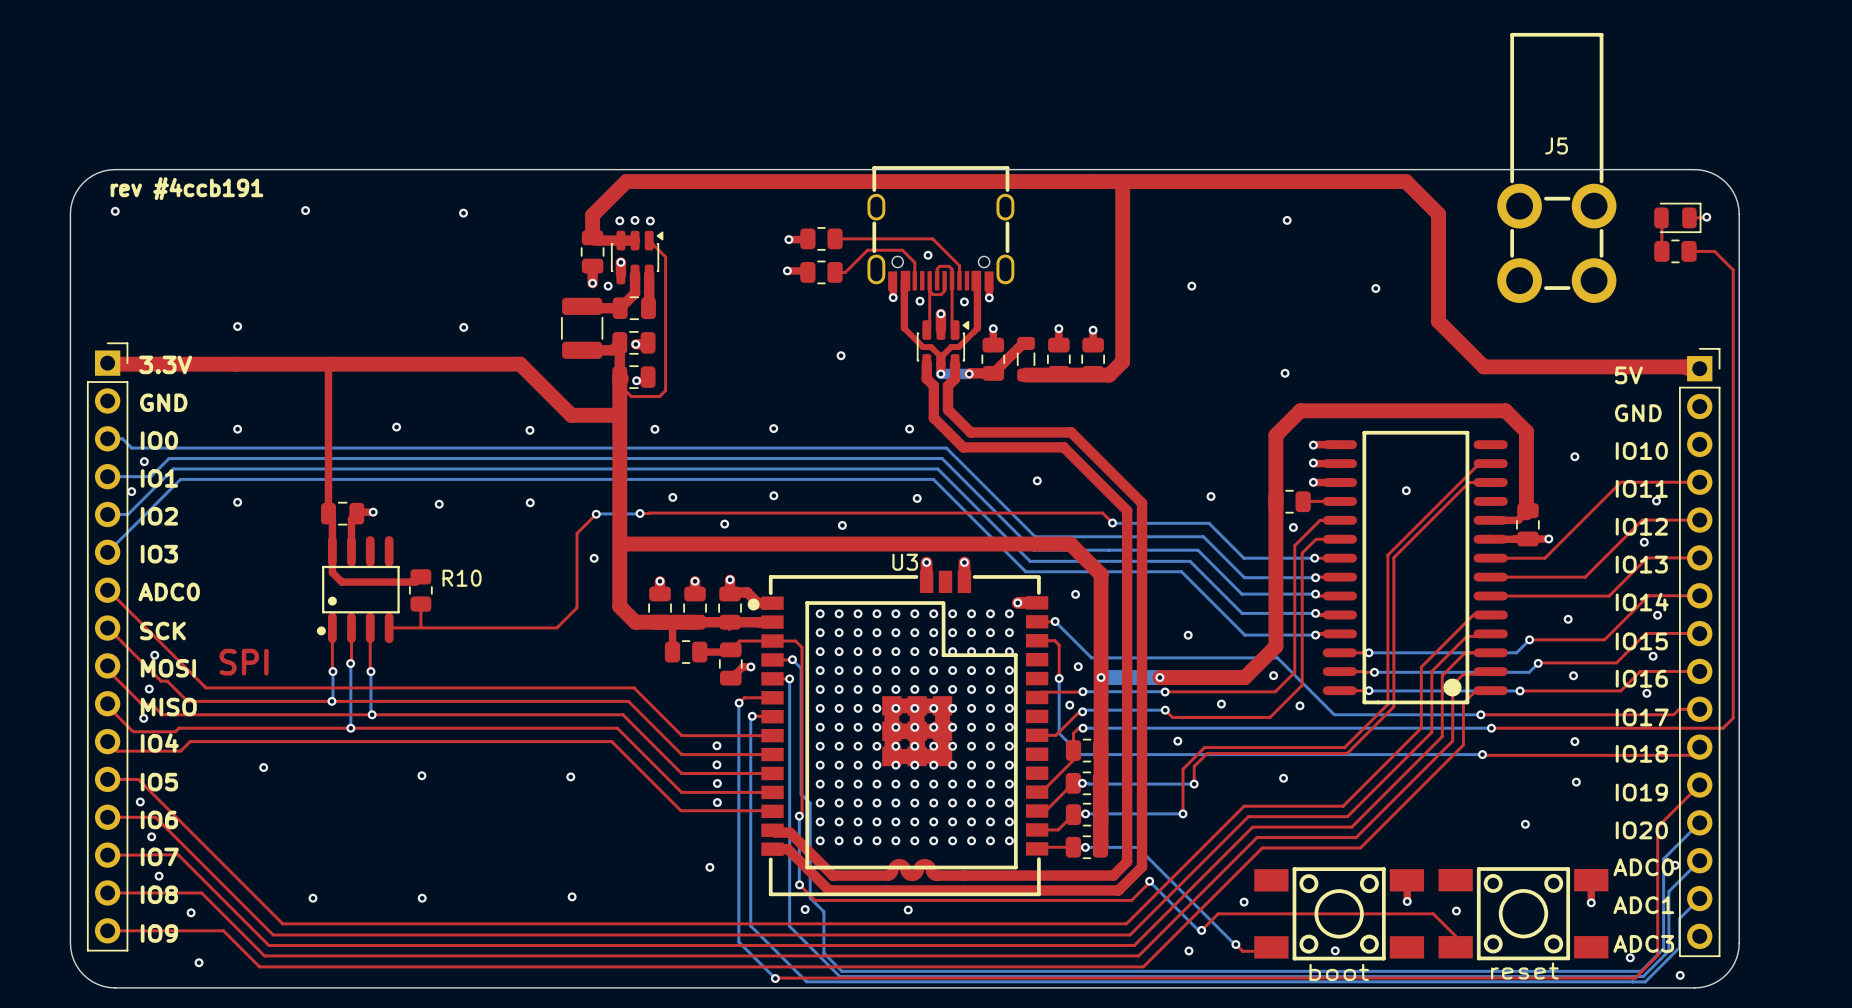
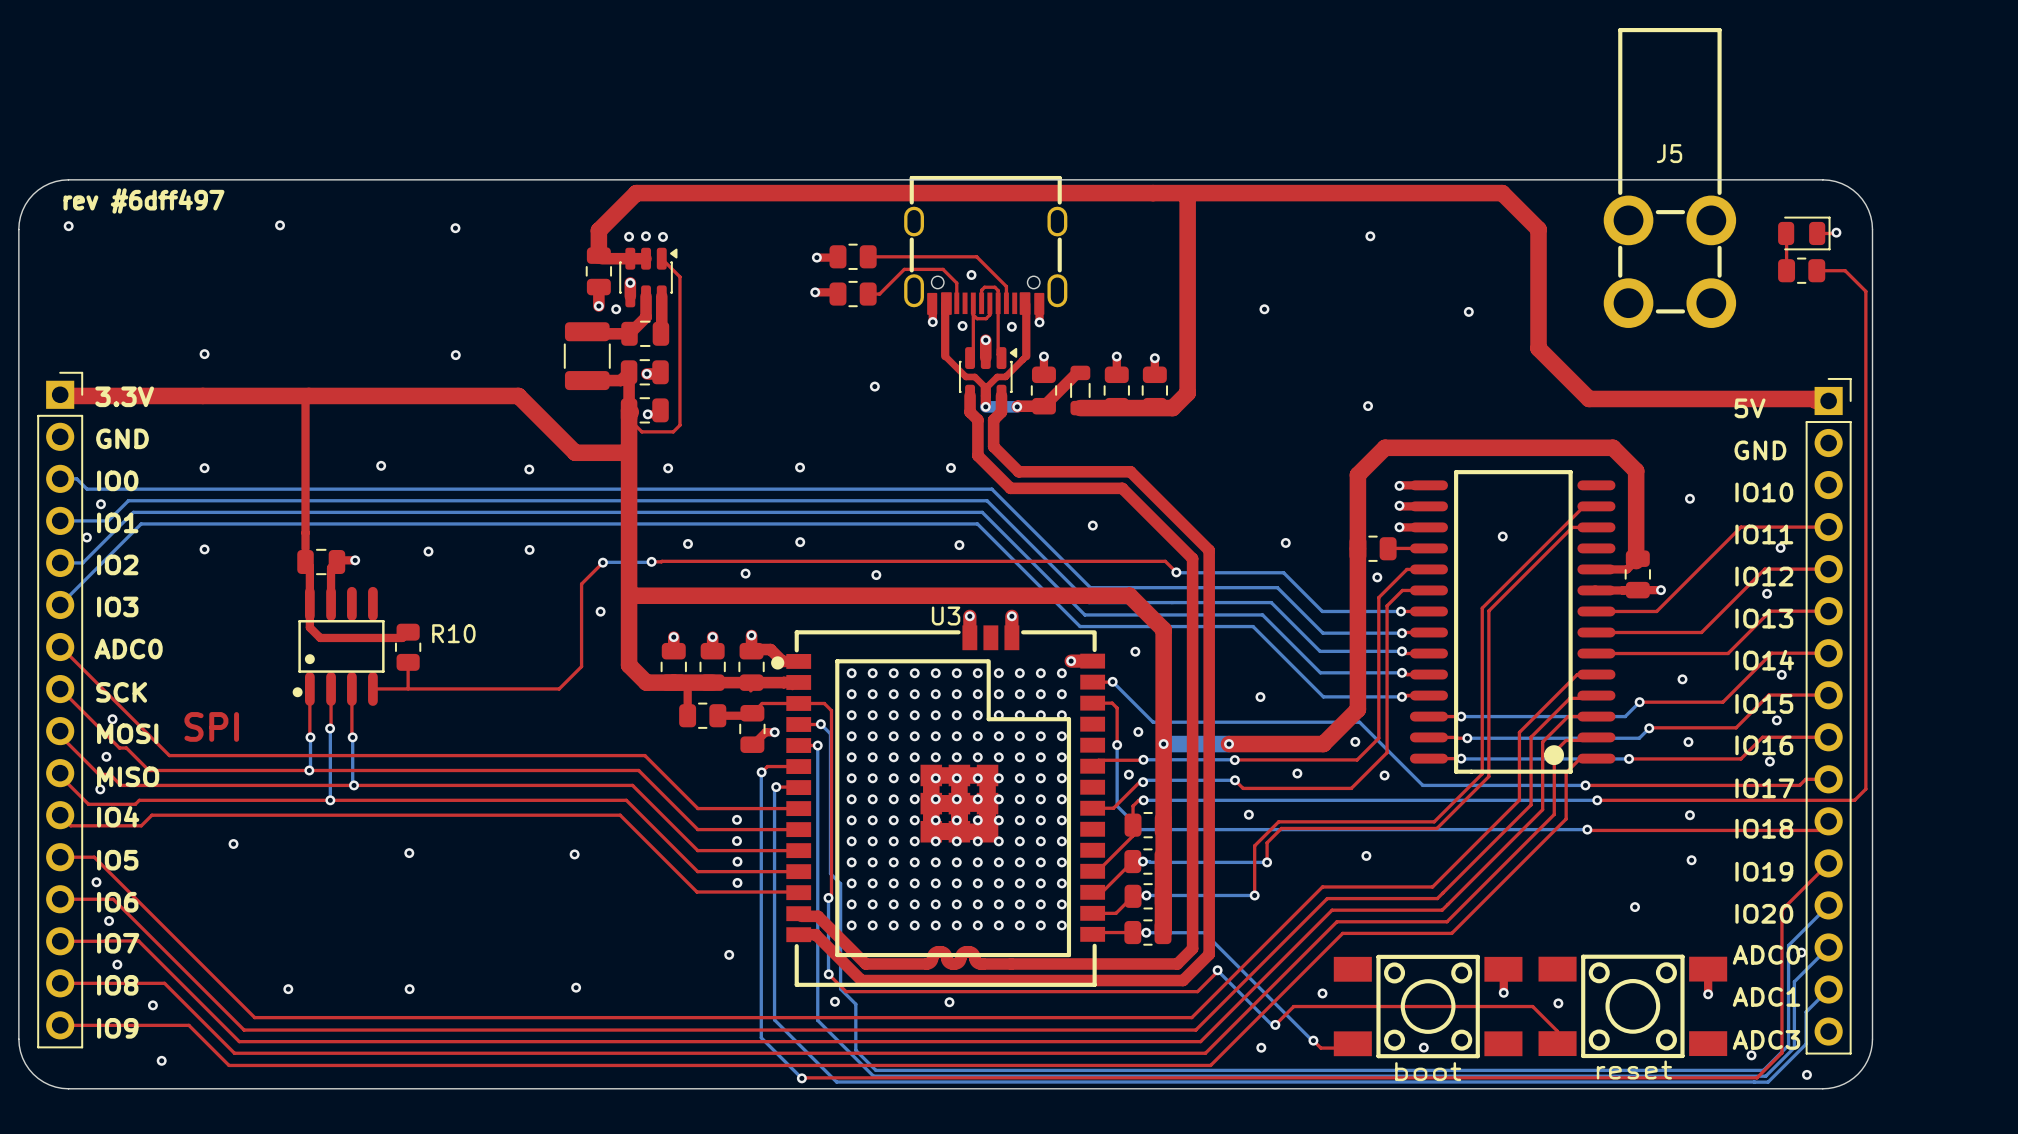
text: rev #4ccb191 (186, 188) -> rev #6dff497 (144, 200)

